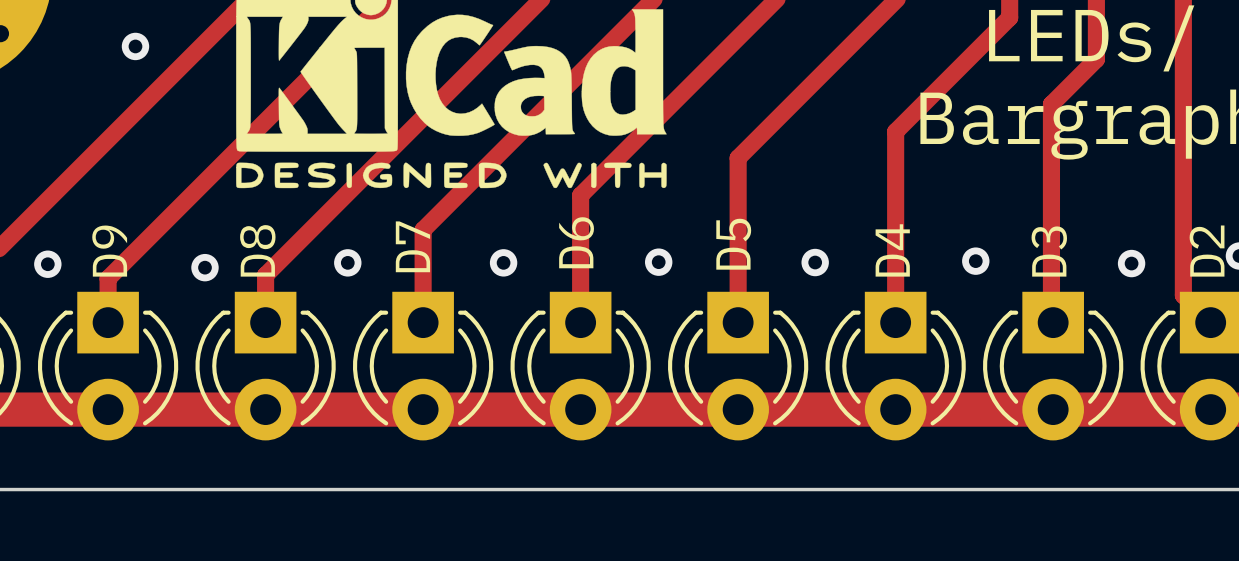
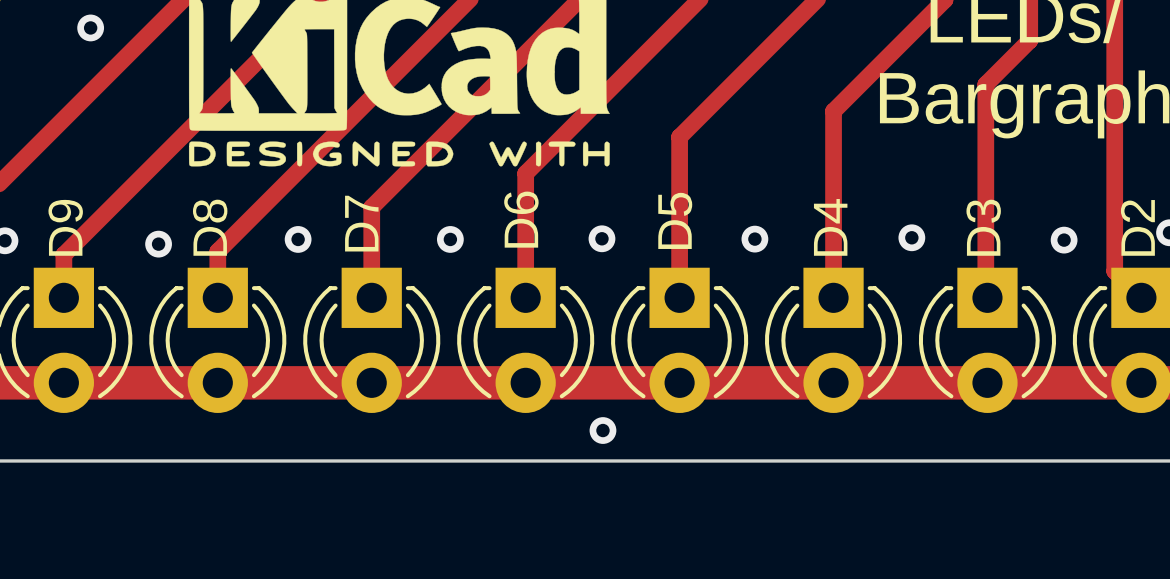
via: none -> (602, 430)

